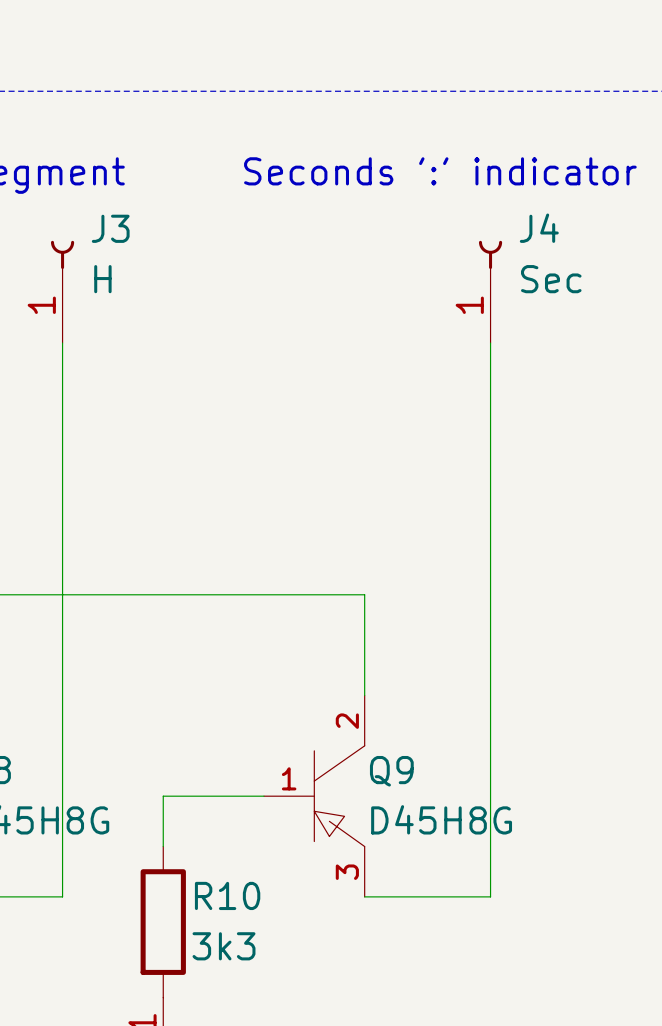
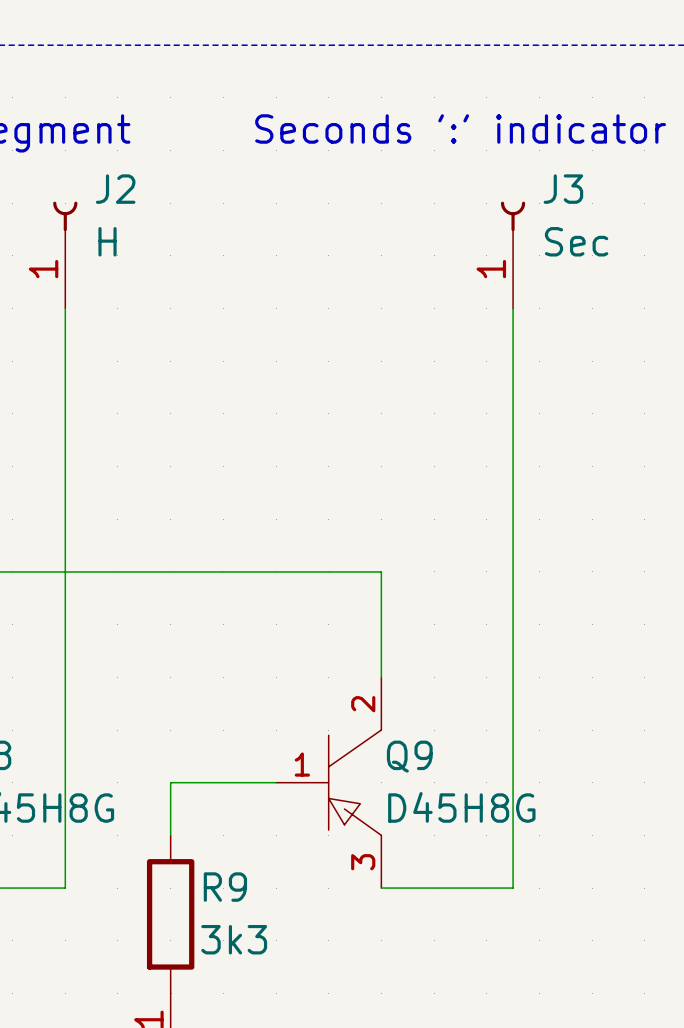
J3 name: J3 (110, 228) -> J2 (115, 189)
J4 name: J4 (539, 228) -> J3 (563, 189)
R10 name: R10 (227, 895) -> R9 (225, 887)

